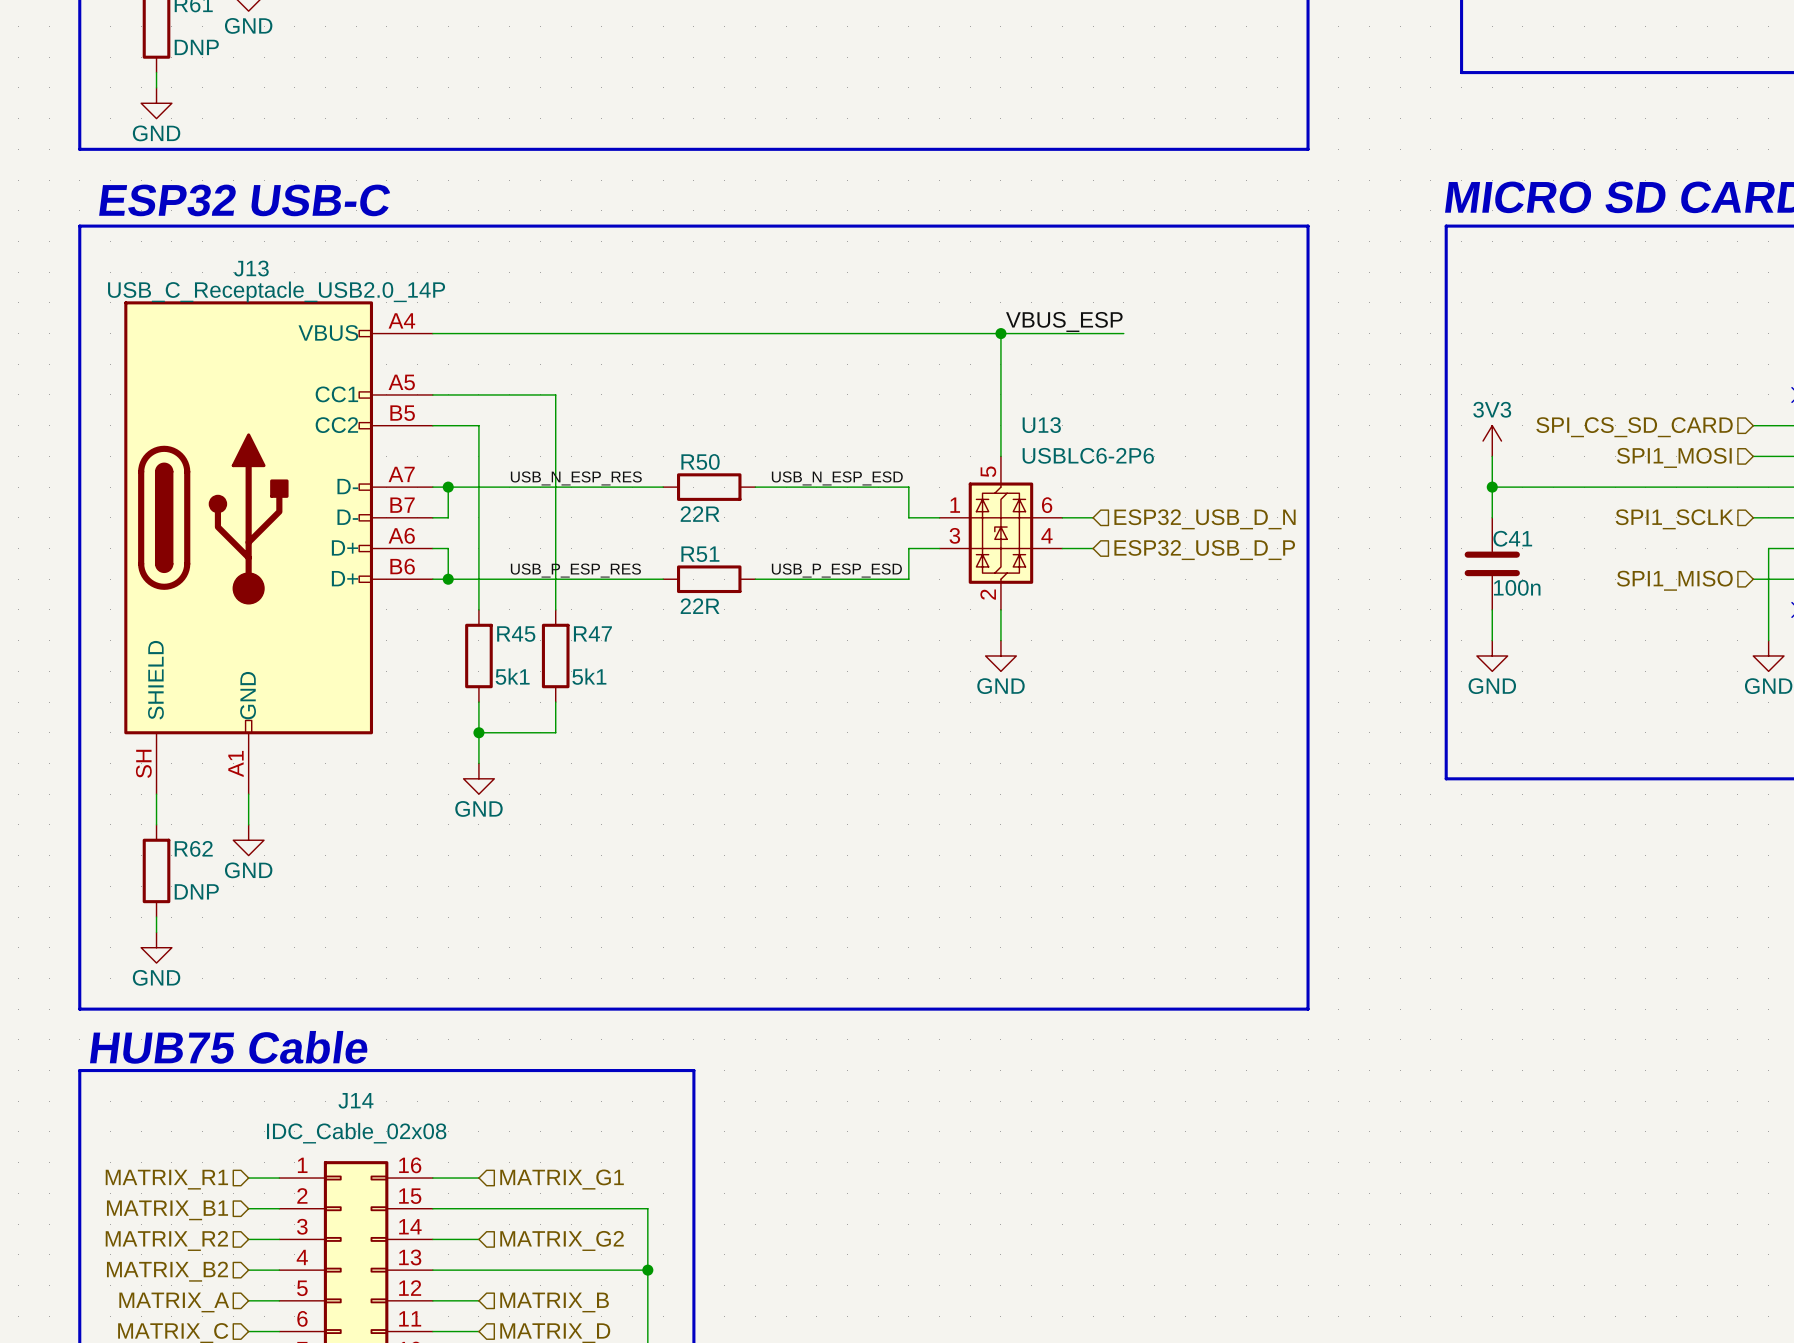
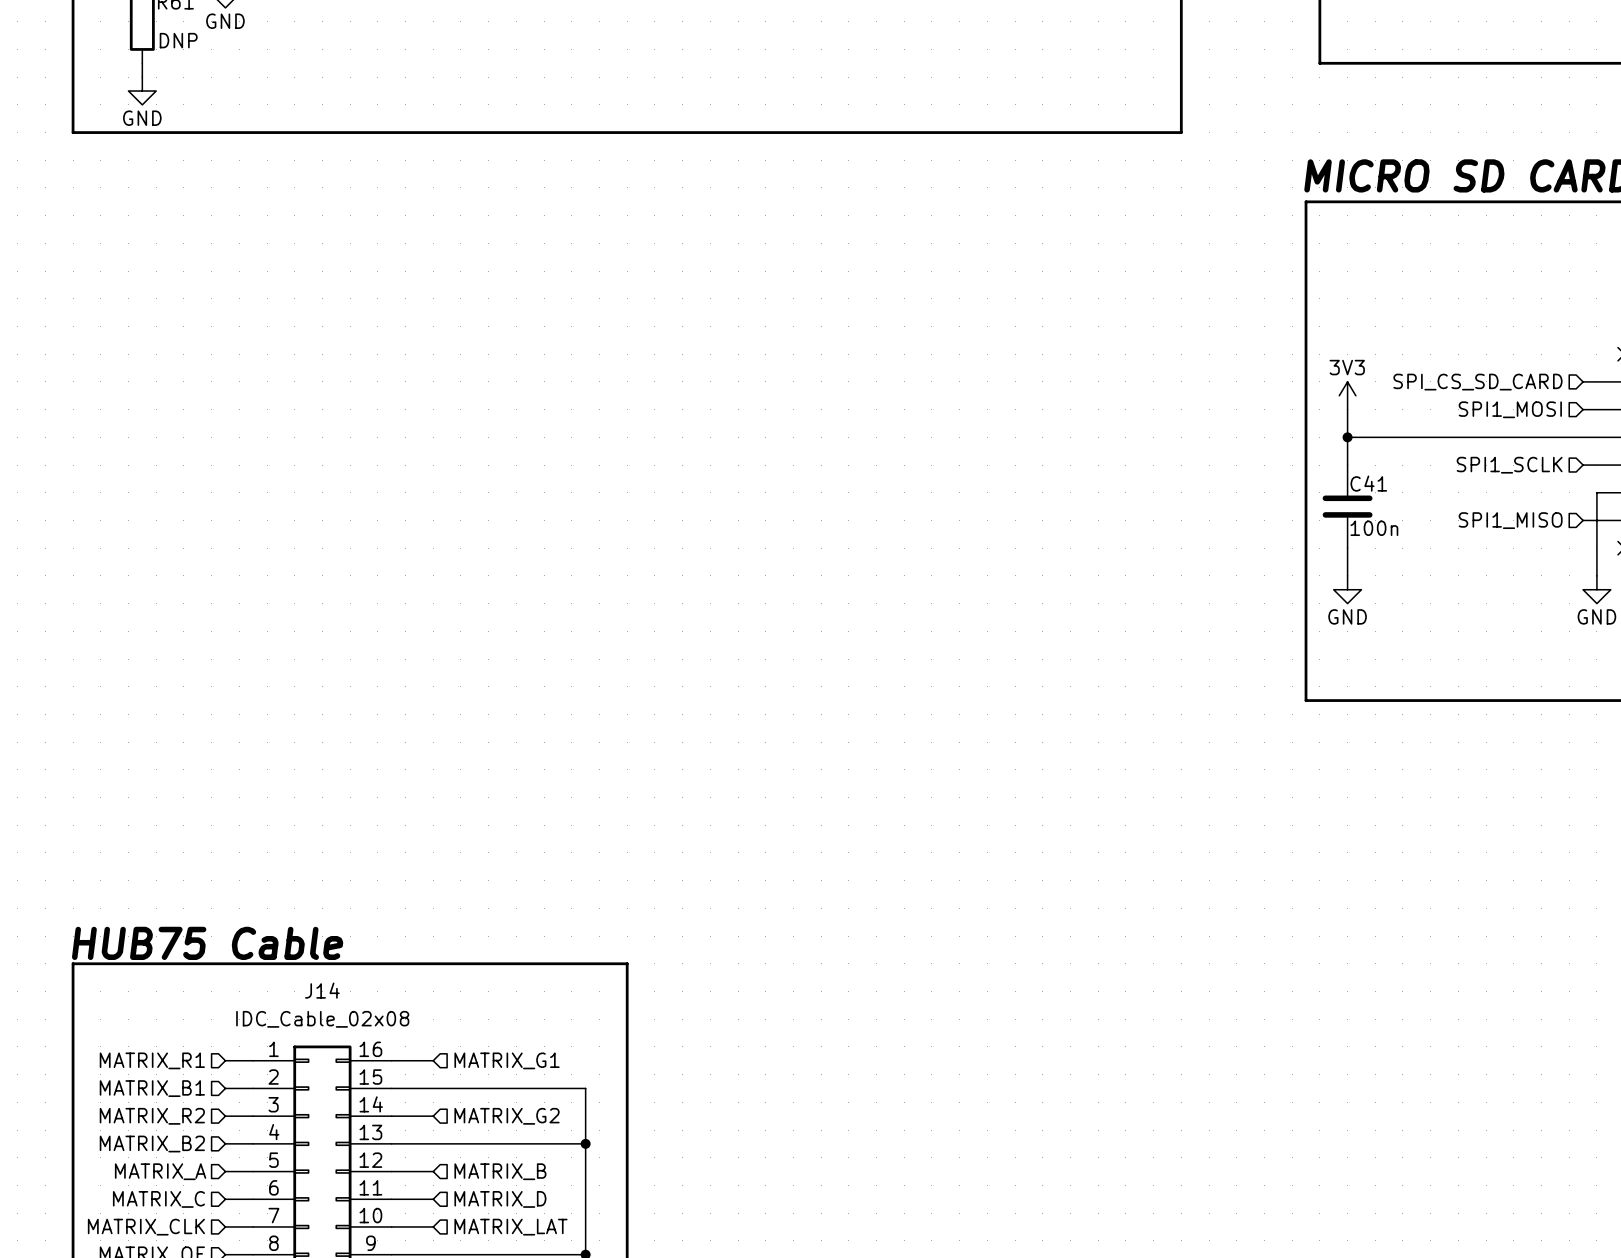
text: ESP32 USB-C (244, 200) -> none
line: (79, 226) (1308, 226) (1308, 1009) (79, 1009) (79, 226) -> none
label: VBUS_ESP (1064, 321) -> none
wire: (432, 333) (1123, 333) -> none
wire: (1000, 333) (1000, 456) -> none
junction: (1000, 333) -> none
wire: (432, 394) (555, 394) (555, 609) -> none
wire: (432, 425) (478, 425) (478, 609) -> none
label: USB_N_ESP_RES (576, 478) -> none
label: USB_N_ESP_ESD (837, 478) -> none
wire: (432, 487) (663, 487) -> none
wire: (448, 487) (448, 517) (432, 517) -> none
junction: (448, 487) -> none
R50: 22R (709, 487) -> none
wire: (755, 487) (908, 487) (908, 517) (939, 517) -> none
wire: (1062, 517) (1093, 517) -> none
hierarchical label: ESP32_USB_D_N (1205, 519) -> none
U13: USBLC6-2P6 (1000, 533) -> none
J13: USB_C_Receptacle_USB2.0_14P (278, 547) -> none
wire: (432, 548) (448, 548) (448, 579) -> none
wire: (939, 548) (908, 548) (908, 579) (755, 579) -> none
wire: (1062, 548) (1093, 548) -> none
hierarchical label: ESP32_USB_D_P (1204, 550) -> none
label: USB_P_ESP_RES (575, 570) -> none
label: USB_P_ESP_ESD (836, 570) -> none
wire: (432, 579) (663, 579) -> none
junction: (448, 579) -> none
R51: 22R (709, 579) -> none
wire: (1000, 609) (1000, 640) -> none
R45: 5k1 (478, 655) -> none
R47: 5k1 (555, 655) -> none
power symbol: GND (1000, 655) -> none
wire: (478, 702) (478, 763) -> none
wire: (555, 702) (555, 732) (478, 732) -> none
junction: (478, 732) -> none
power symbol: GND (478, 778) -> none
wire: (156, 794) (156, 824) -> none
wire: (248, 794) (248, 824) -> none
power symbol: GND (248, 840) -> none
R62: DNP (156, 870) -> none
wire: (156, 917) (156, 932) -> none
power symbol: GND (156, 947) -> none

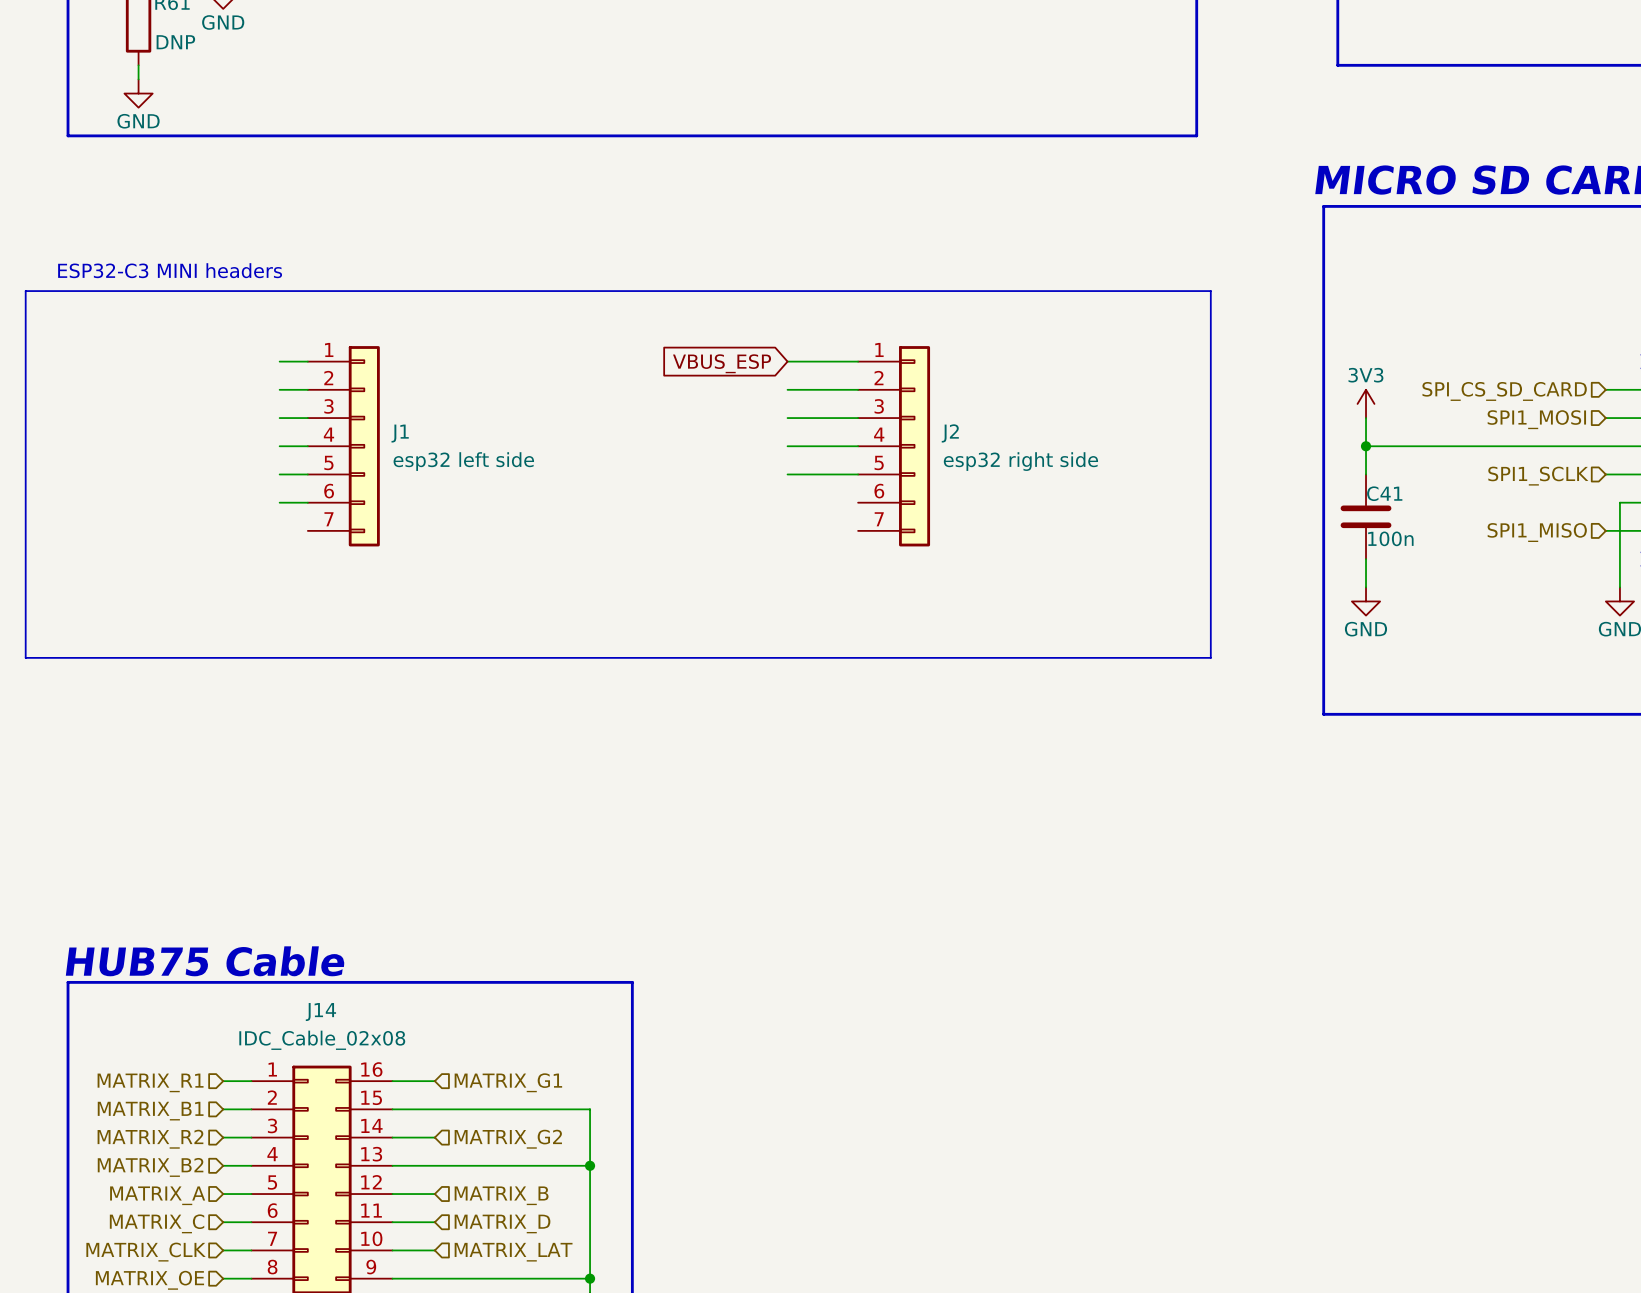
text: none -> ESP32-C3 MINI headers (170, 270)
line: none -> (25, 291) (1210, 291) (1210, 657) (25, 657) (25, 291)
wire: none -> (279, 361) (307, 361)
global label: none -> VBUS_ESP (722, 363)
wire: none -> (787, 361) (858, 361)
wire: none -> (279, 389) (307, 389)
wire: none -> (787, 389) (858, 389)
wire: none -> (279, 418) (307, 418)
wire: none -> (787, 418) (858, 418)
wire: none -> (279, 446) (307, 446)
J1: none -> esp32 left side (343, 446)
wire: none -> (787, 446) (858, 446)
J2: none -> esp32 right side (894, 446)
wire: none -> (279, 474) (307, 474)
wire: none -> (787, 474) (858, 474)
wire: none -> (279, 502) (307, 502)

